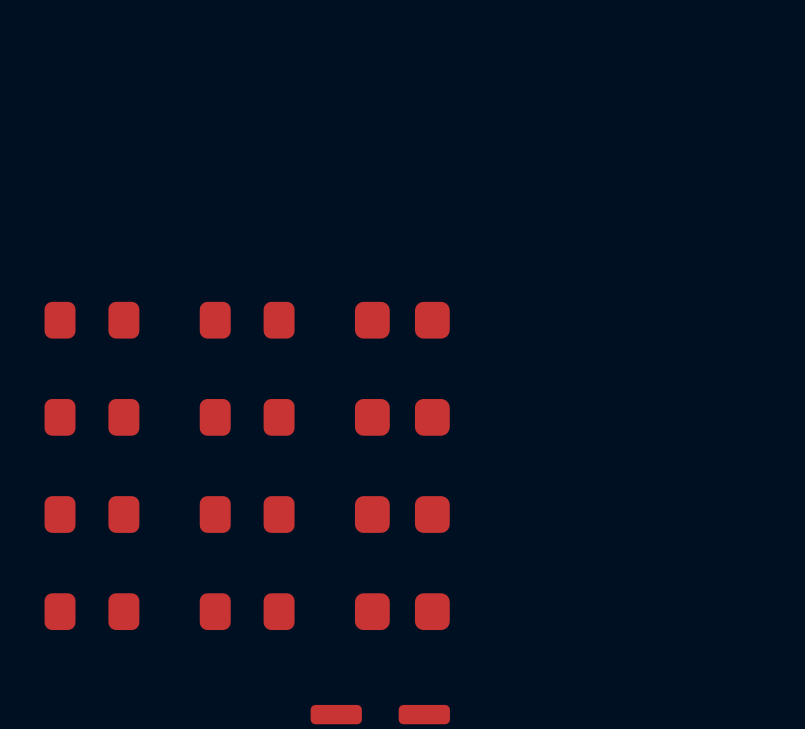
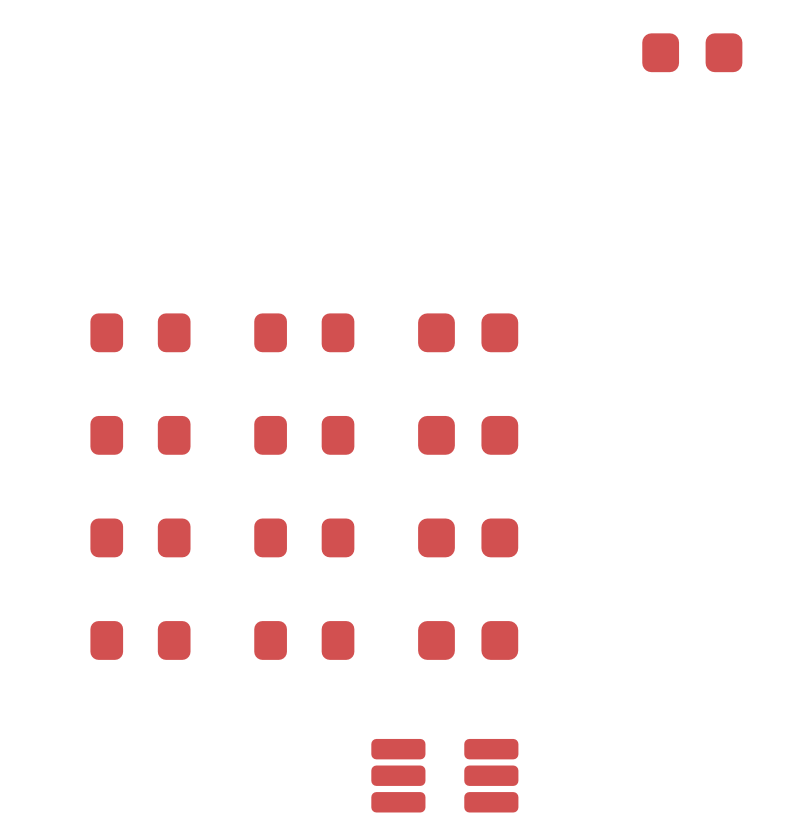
part: none -> (692, 52)

